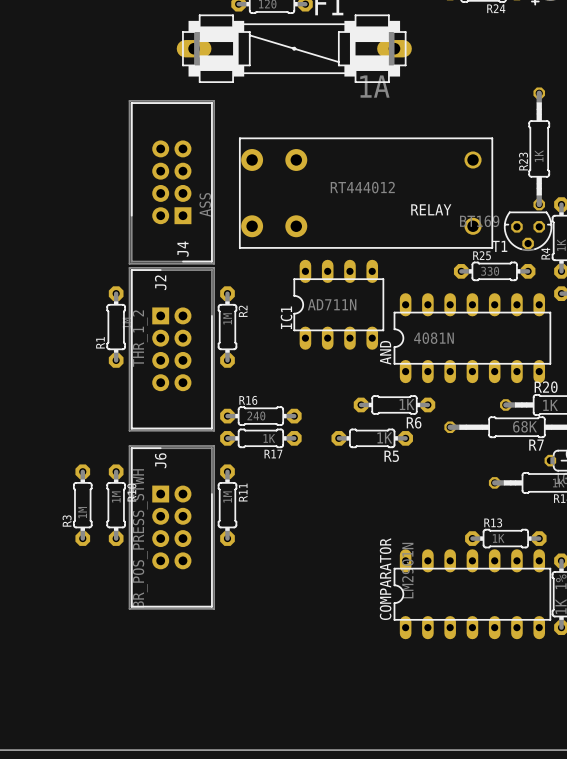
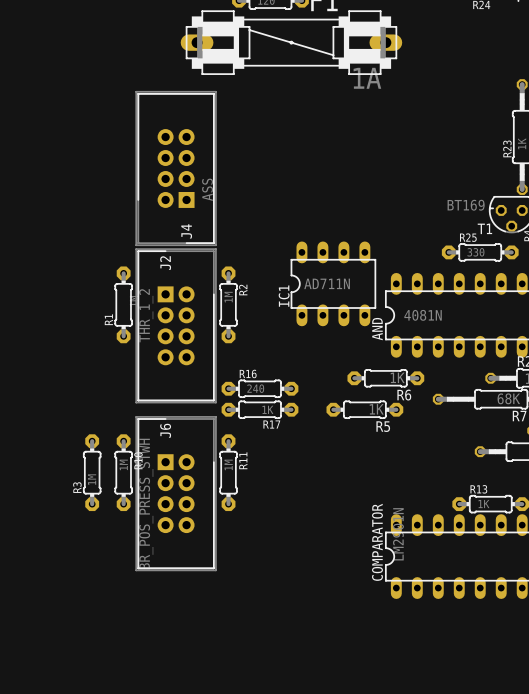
RELAY: RT444012 (366, 193) -> none

